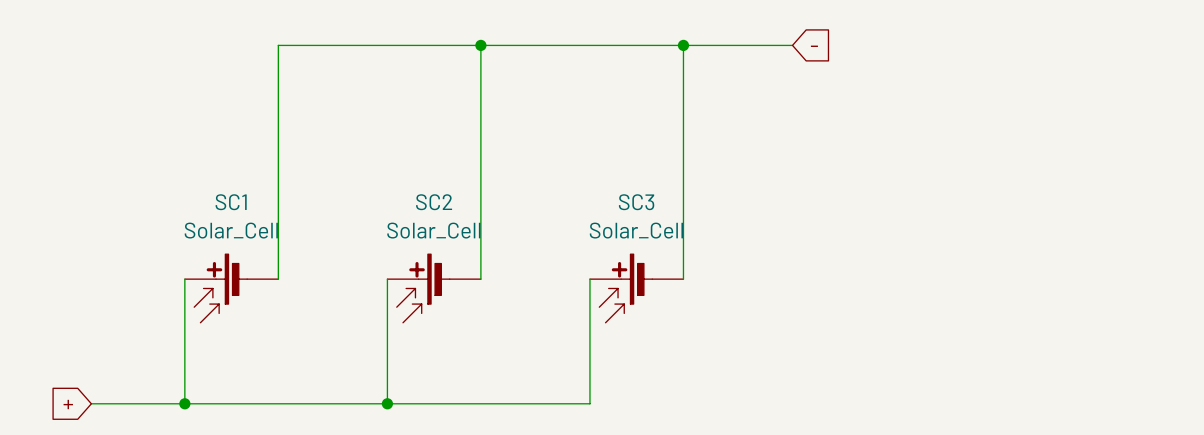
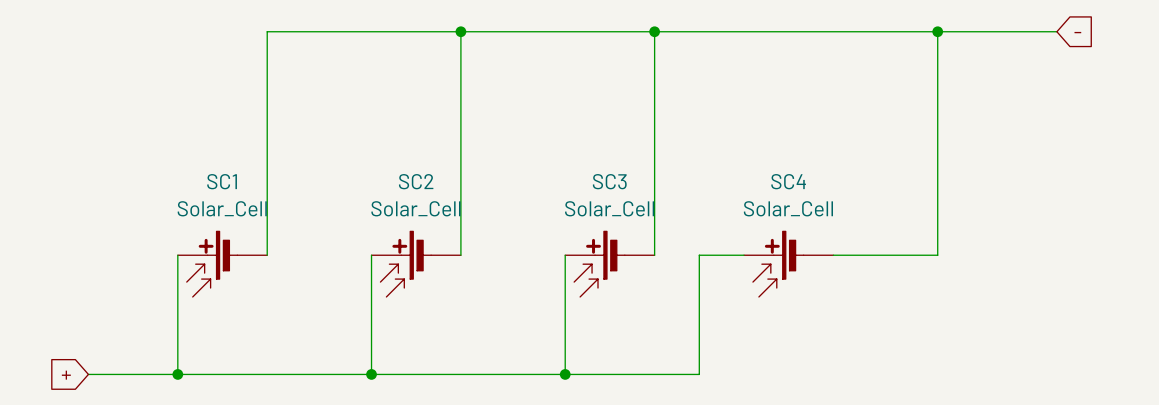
wire: none -> (758, 31) (1056, 31)
wire: none -> (937, 31) (937, 255) (833, 255)
junction: none -> (937, 31)
global label: - (814, 46) -> none
global label: none -> - (1077, 32)
wire: none -> (744, 255) (699, 255) (699, 374) (565, 374)
SC4: none -> Solar_Cell (788, 264)
junction: none -> (565, 374)

